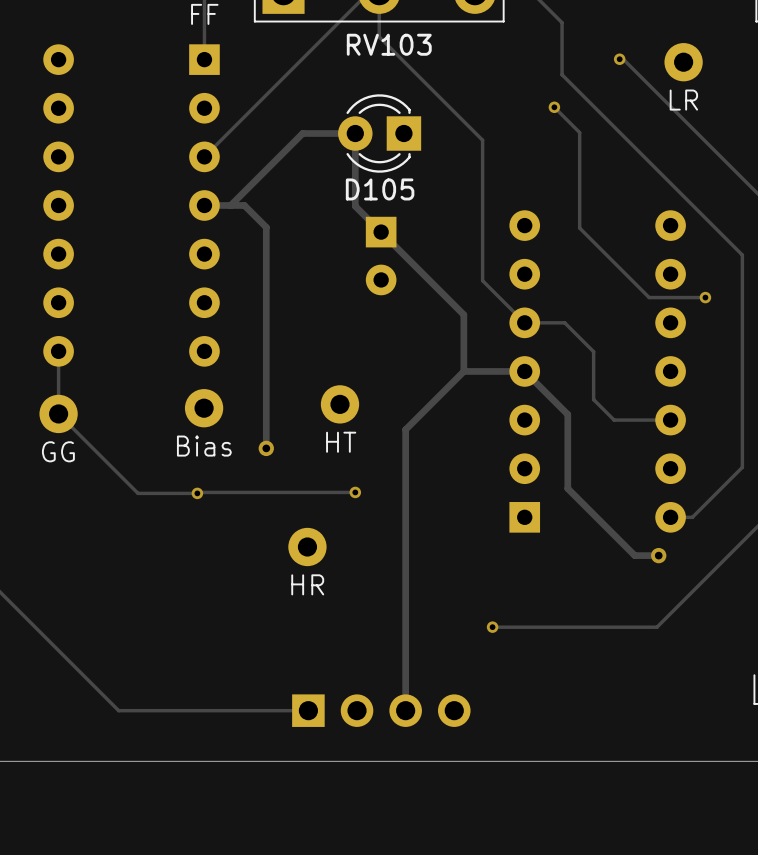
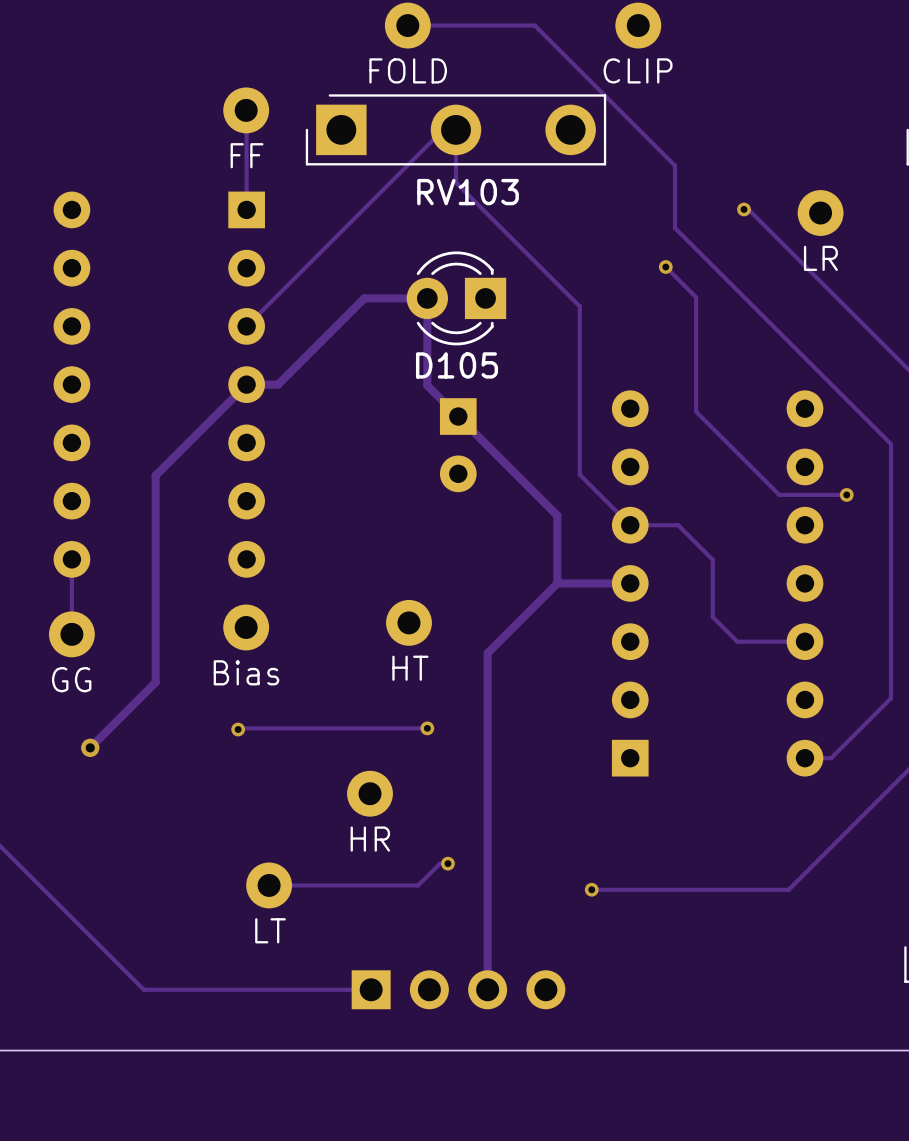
track: none -> (246, 384) (155, 475) (155, 682) (90, 747)
track: (230, 205) (244, 205) (266, 227) (266, 448) -> none
track: (524, 371) (567, 414) (567, 488) (634, 555) (658, 555) -> none
track: (58, 413) (138, 493) (197, 493) -> none
via: (266, 448) -> none
via: none -> (90, 747)
via: (658, 555) -> none
track: none -> (447, 863) (439, 863) (418, 885) (269, 885)
via: none -> (447, 863)
part: none -> LT (269, 885)

